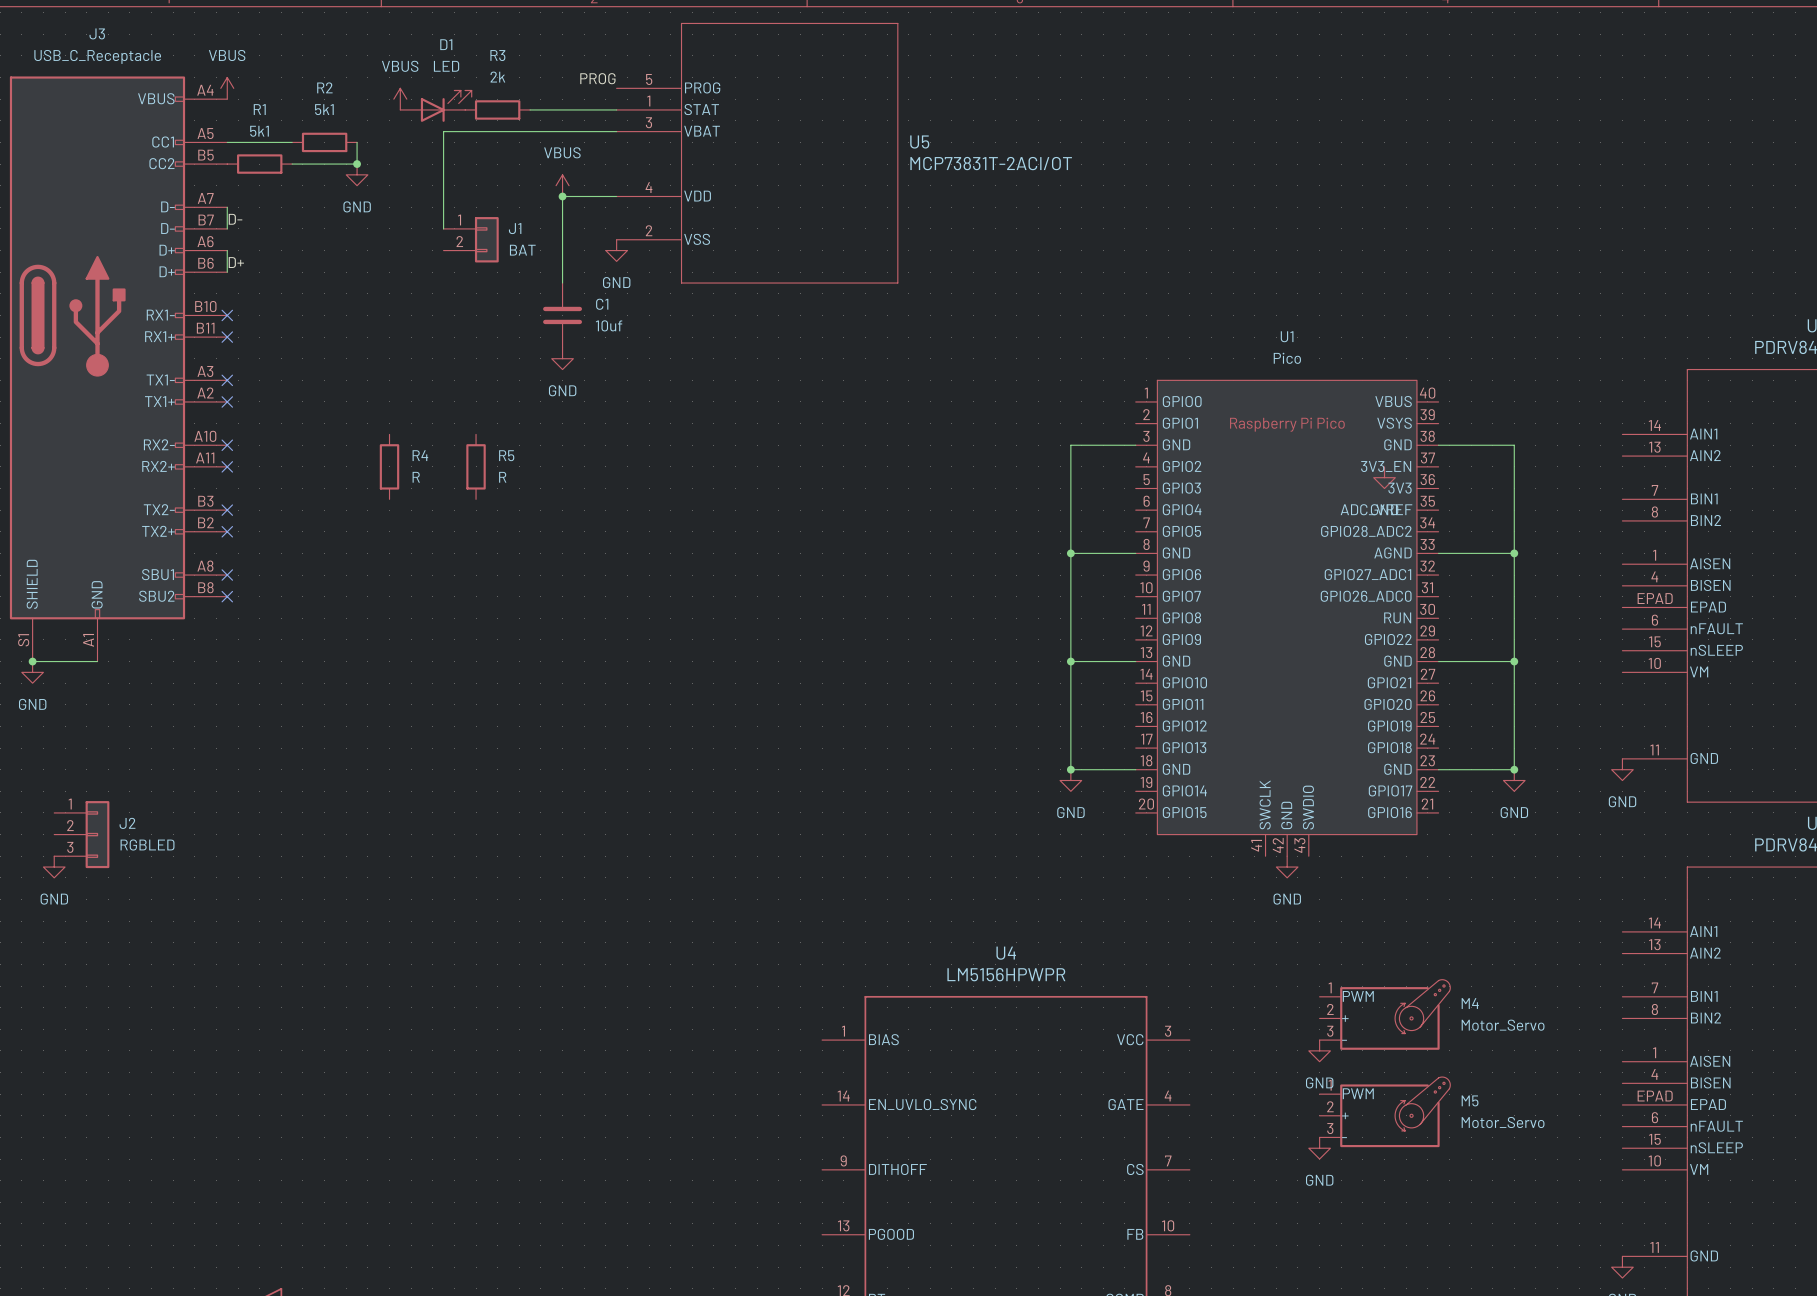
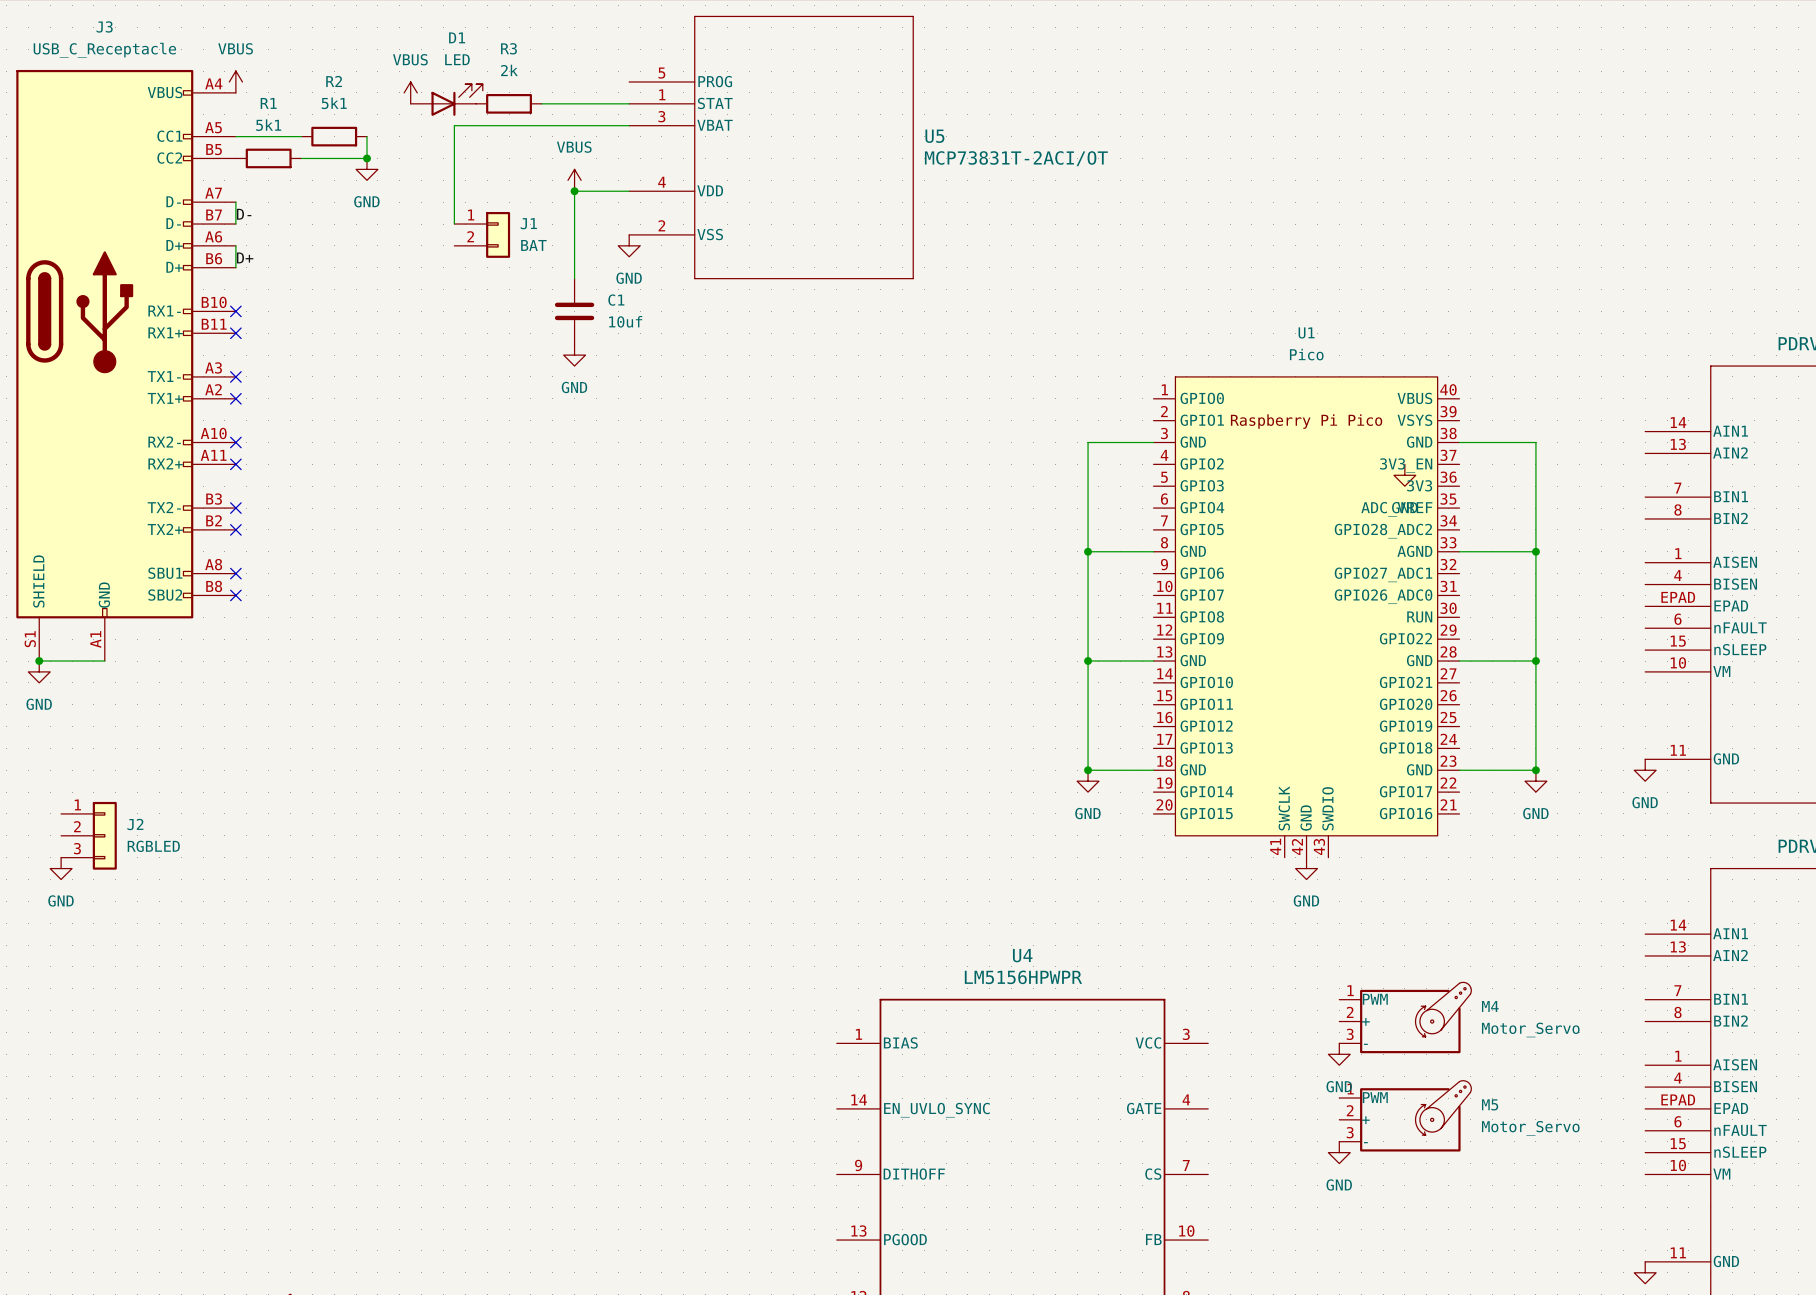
label: PROG (597, 78) -> none
R4: R (389, 466) -> none
R5: R (476, 466) -> none

